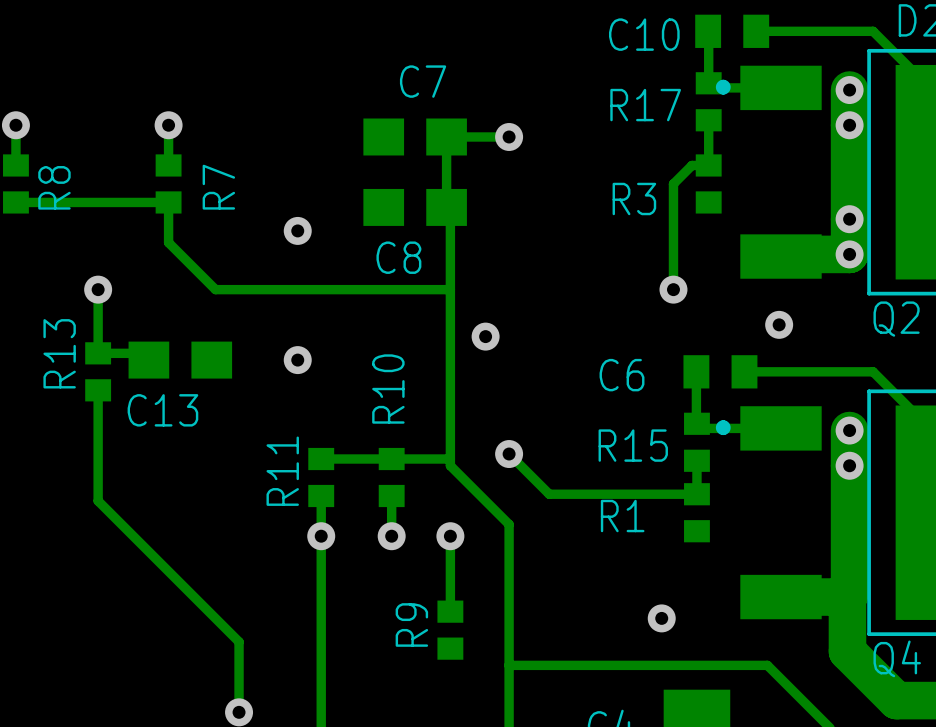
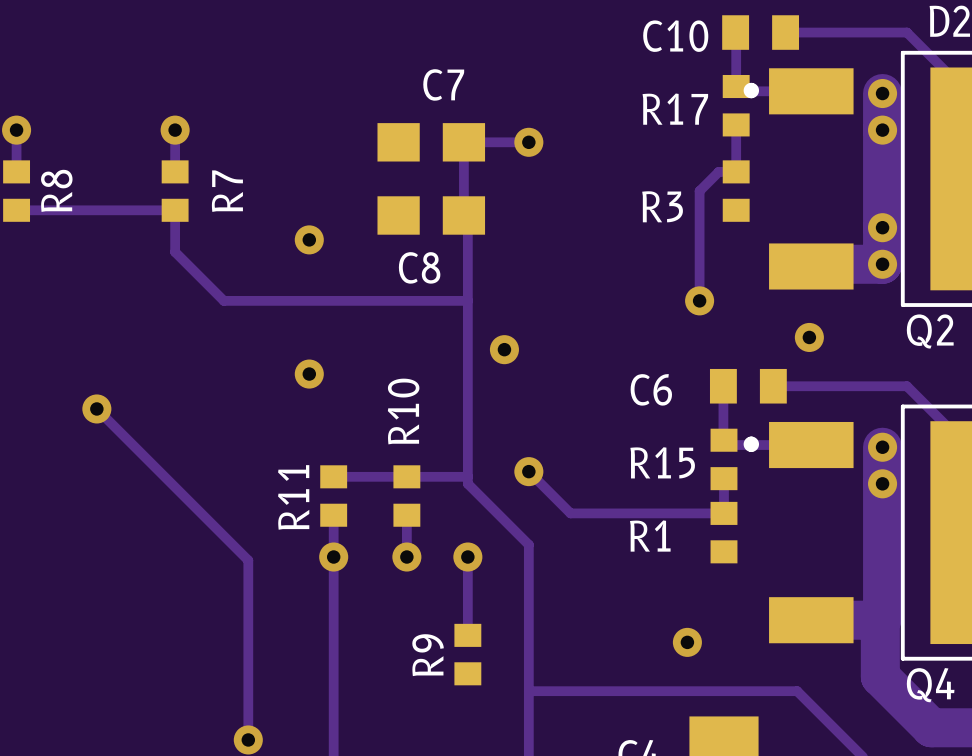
track: (98, 289) (98, 353) (142, 353) (148, 360) -> none
via position: (98, 289) -> (96, 408)
C13: (180, 360) -> none
R13: (98, 371) -> none
track: (98, 390) (98, 500) (239, 641) -> (96, 408) (248, 560) (248, 666)

